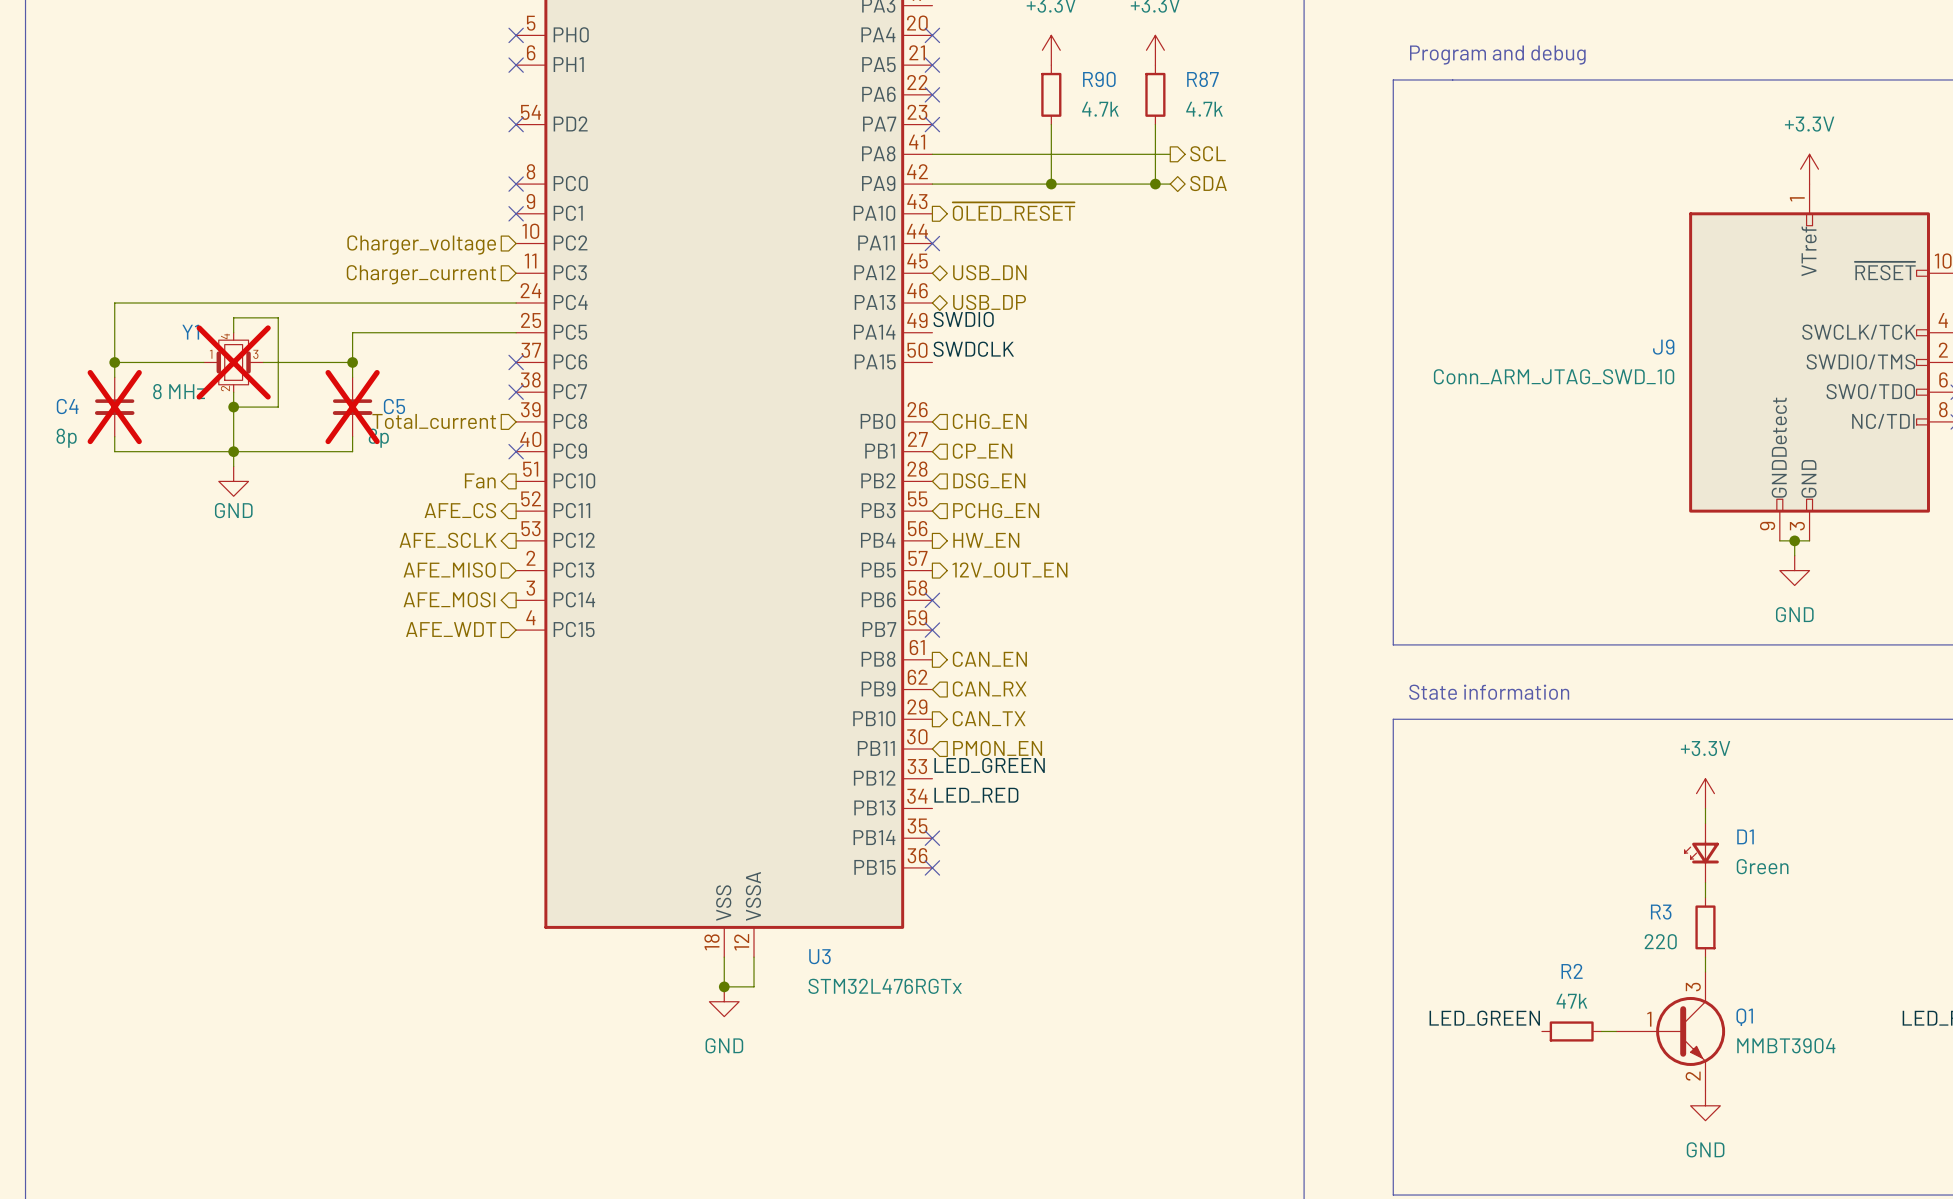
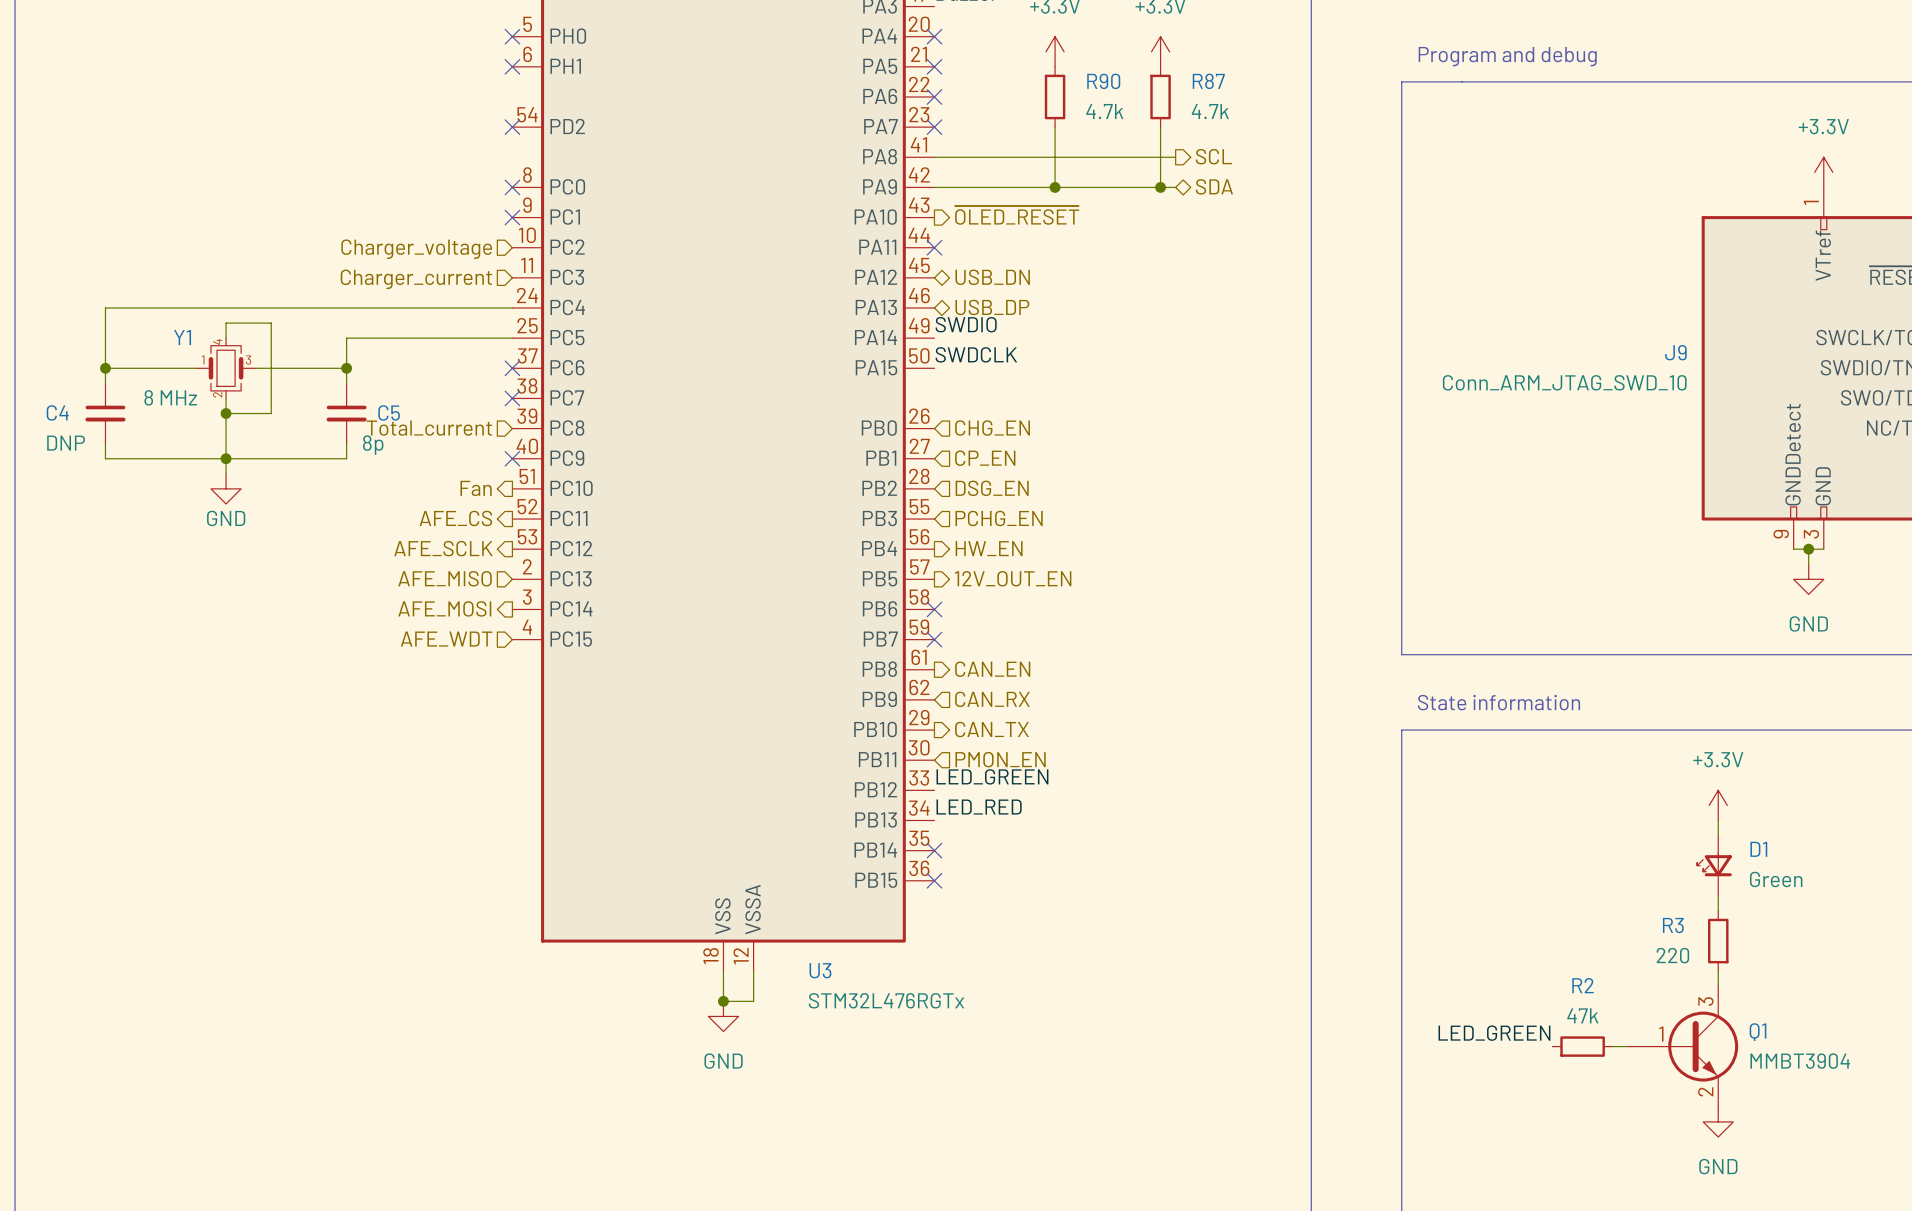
Y1 do-not-place cross: (233, 362) -> none
C4 do-not-place cross: (114, 407) -> none
C5 do-not-place cross: (352, 407) -> none
C4 value: 8p (66, 438) -> DNP (66, 443)

